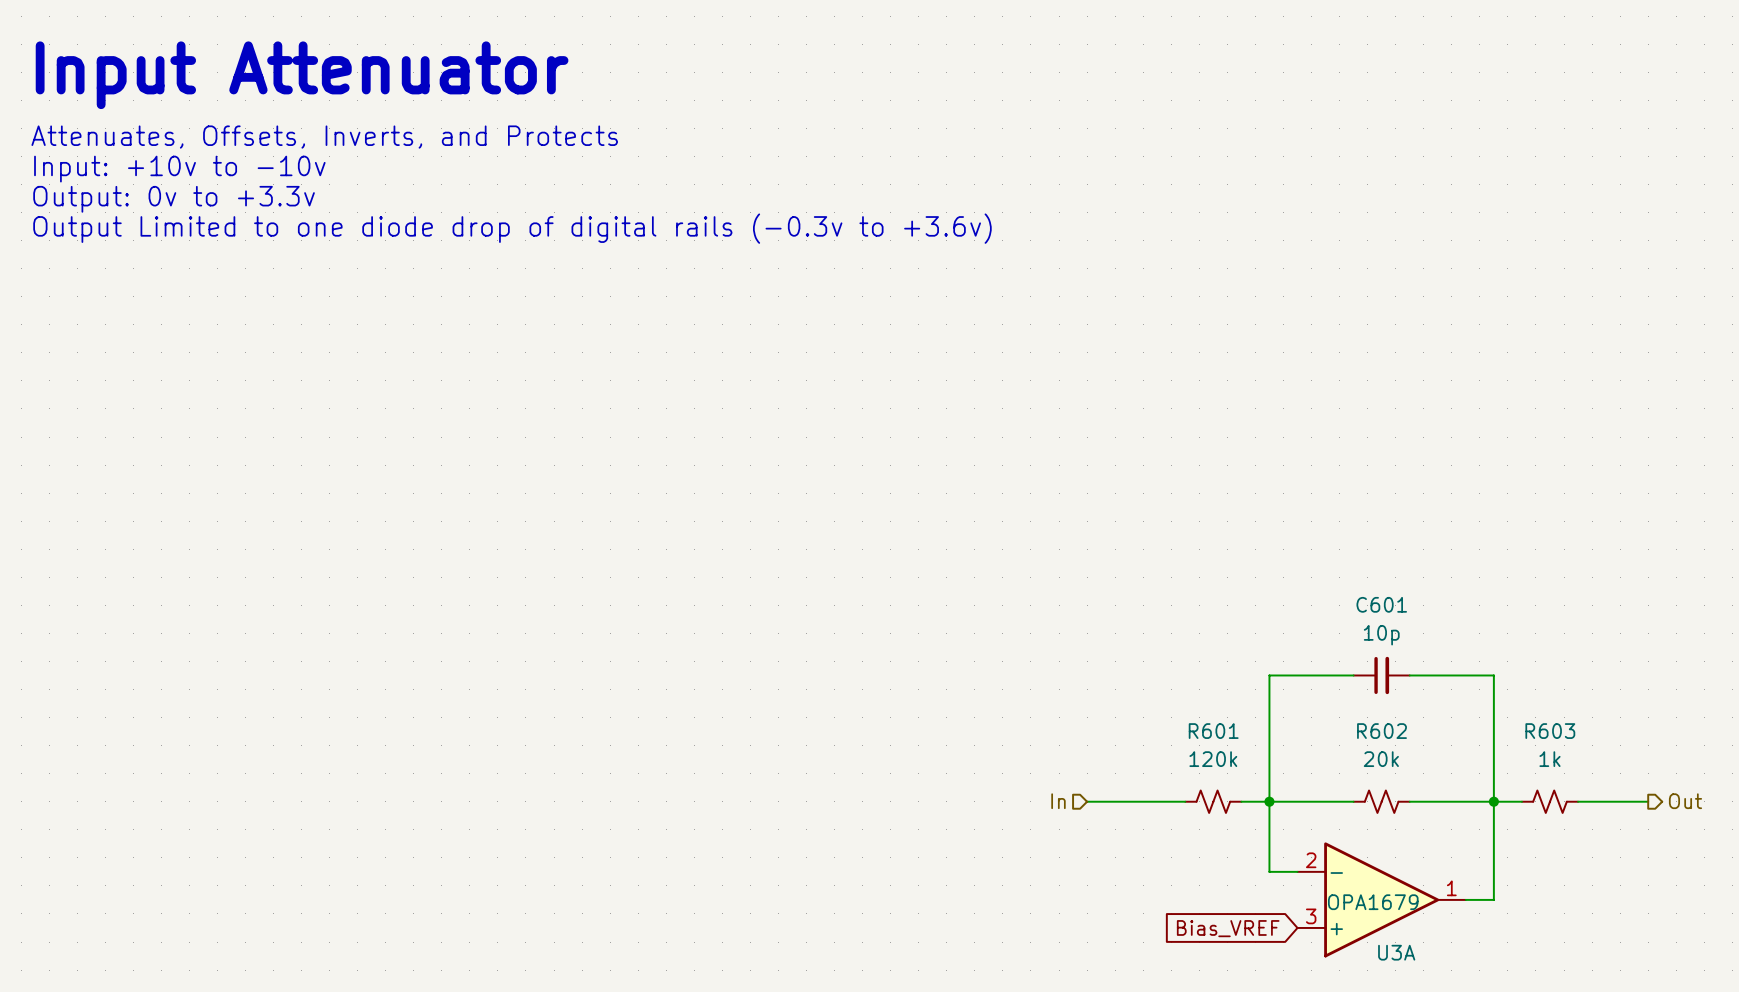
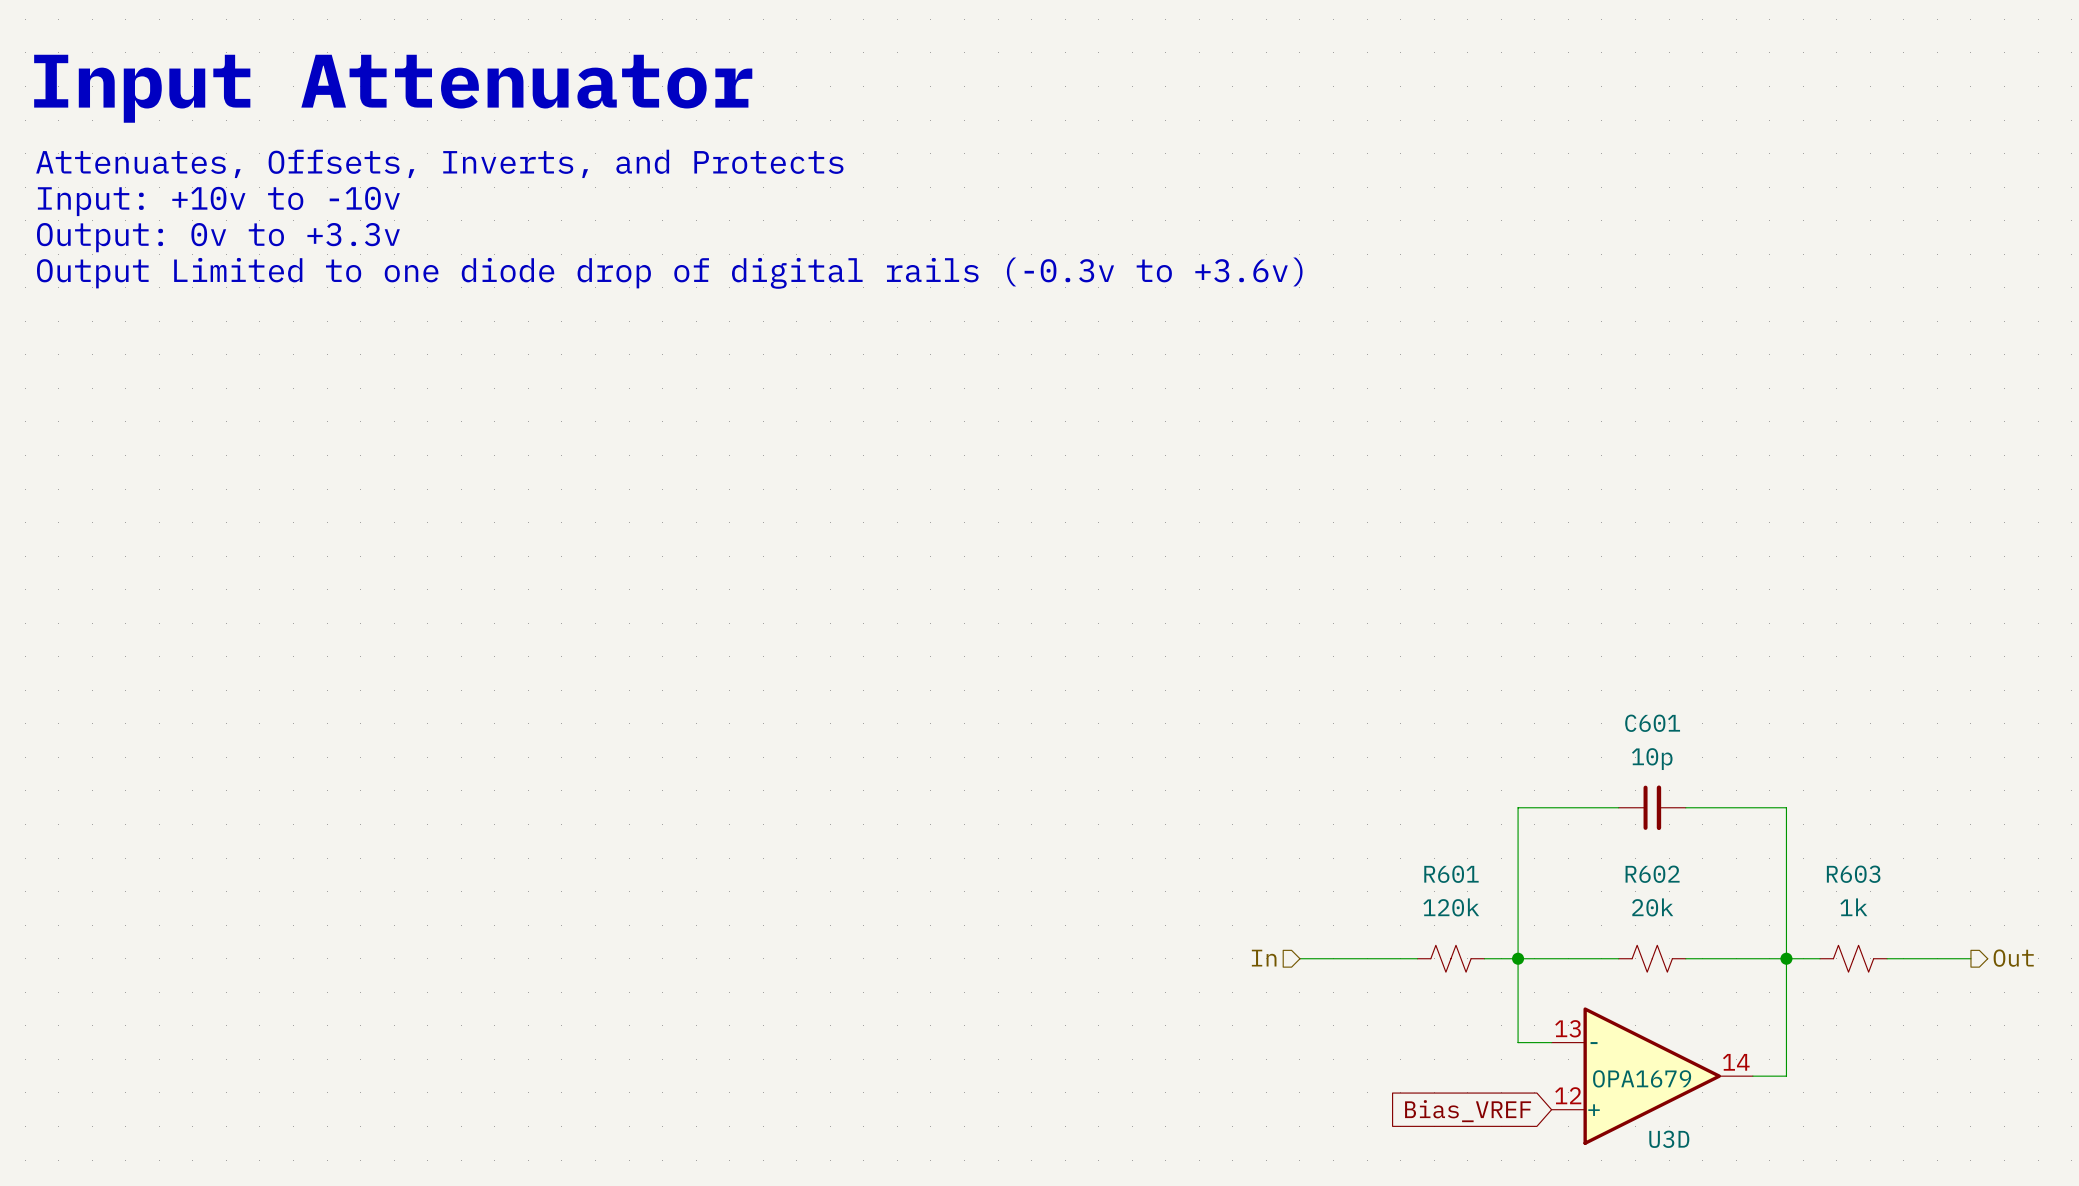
U3A pin number: 2 (1311, 860) -> 13 (1568, 1028)
U3A pin number: 1 (1451, 888) -> 14 (1736, 1062)
U3A pin number: 3 (1311, 916) -> 12 (1568, 1095)
U3A name: U3A (1396, 952) -> U3D (1669, 1139)

